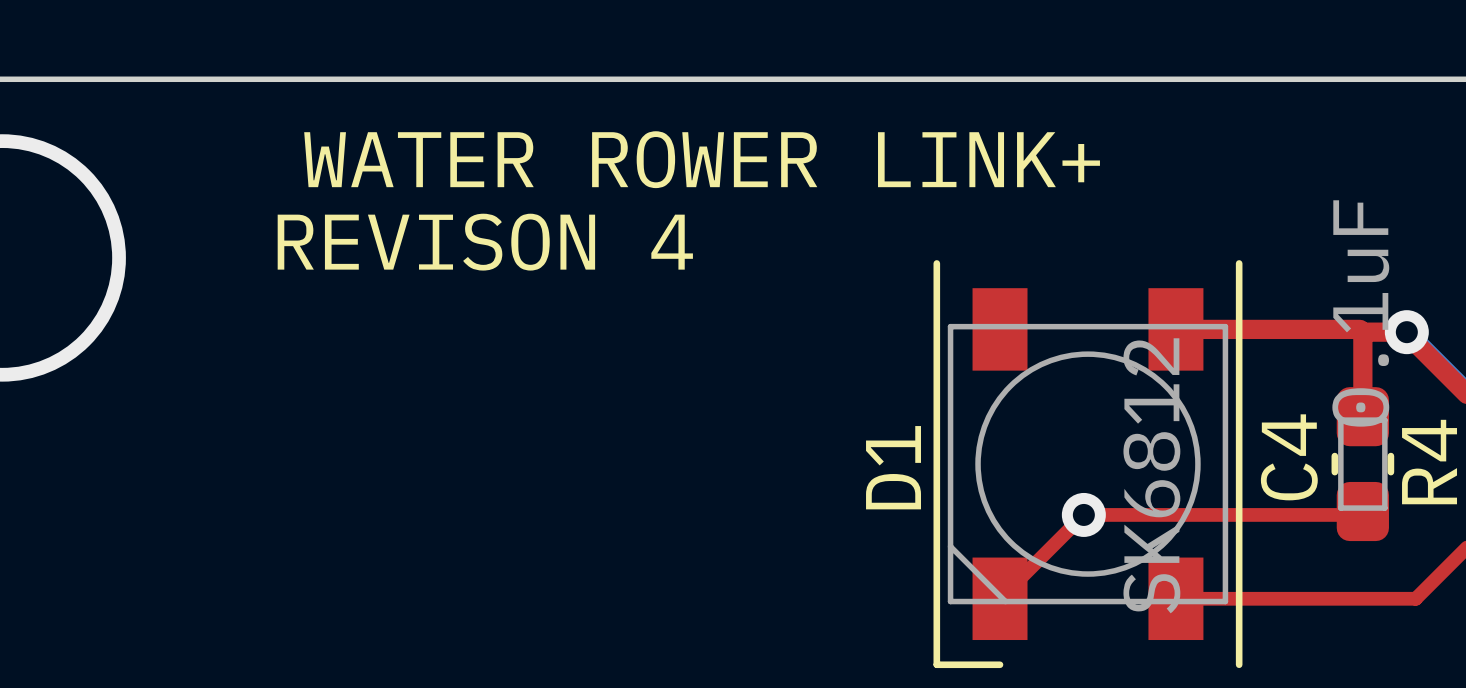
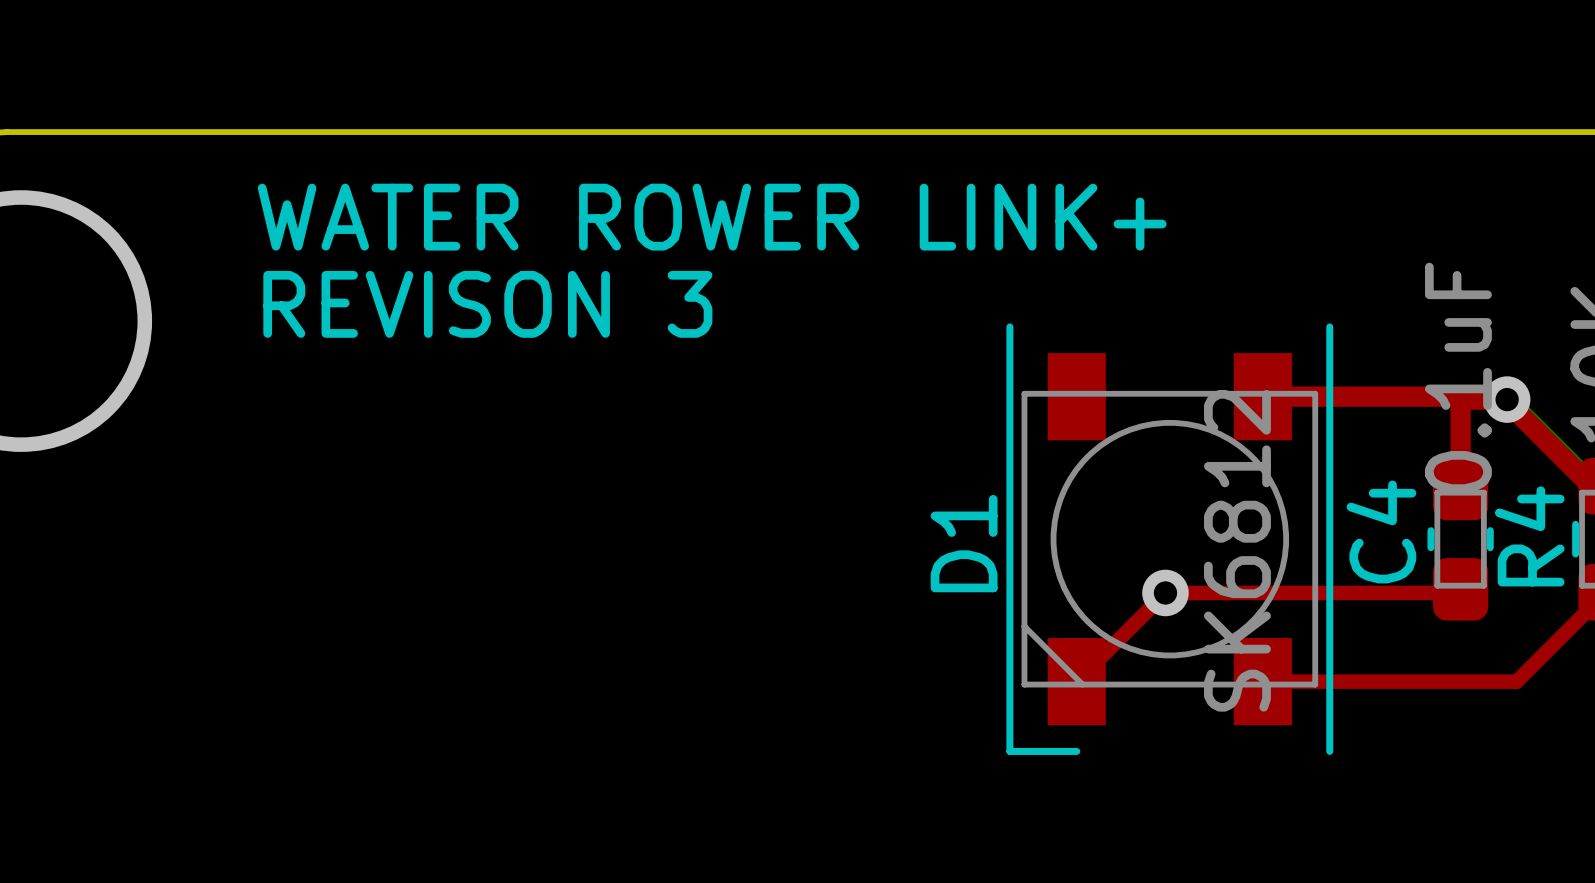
text position: WATER ROWER LINK+ (702, 159) -> WATER ROWER LINK+ (712, 217)
text: REVISON 4 (485, 242) -> REVISON 3 (487, 304)

